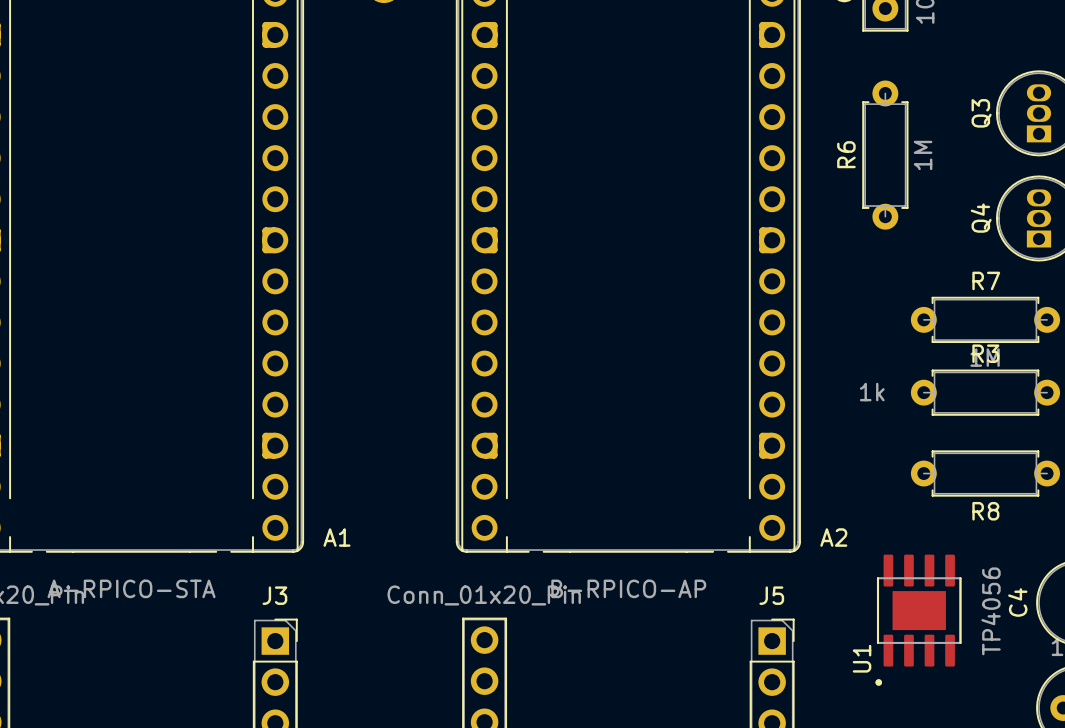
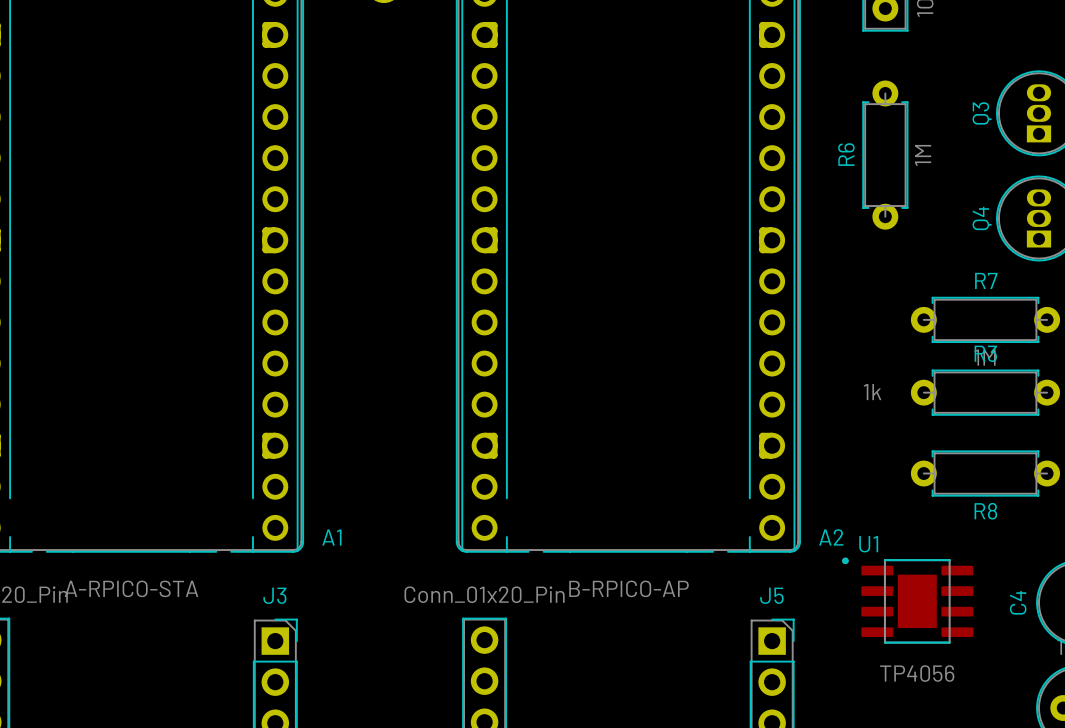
U1 rotation: 0° (918, 620) -> 90° clockwise (907, 600)

